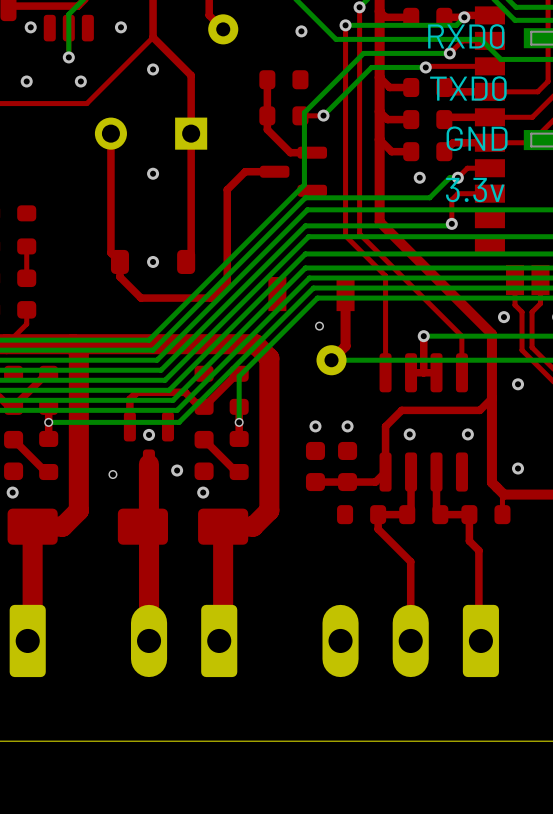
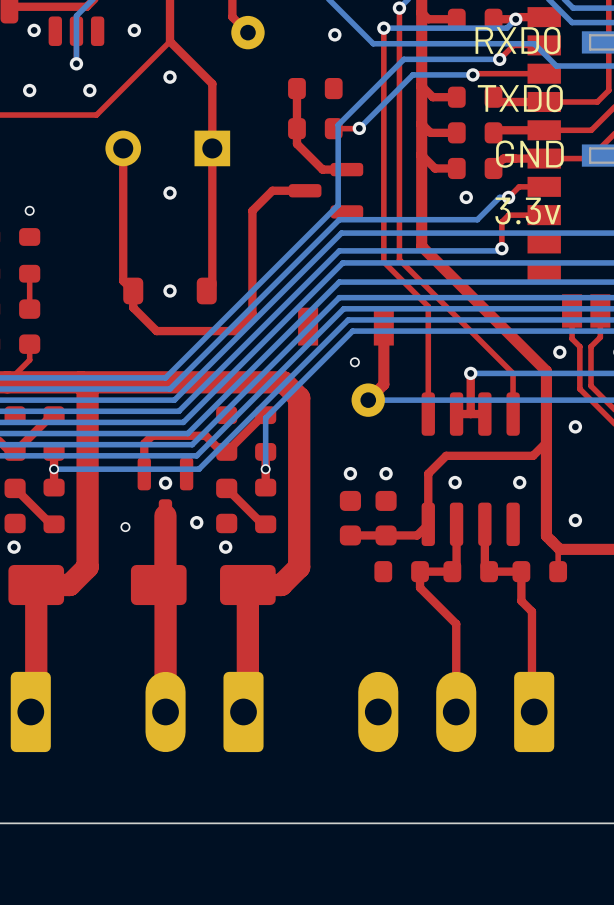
via: none -> (29, 210)

